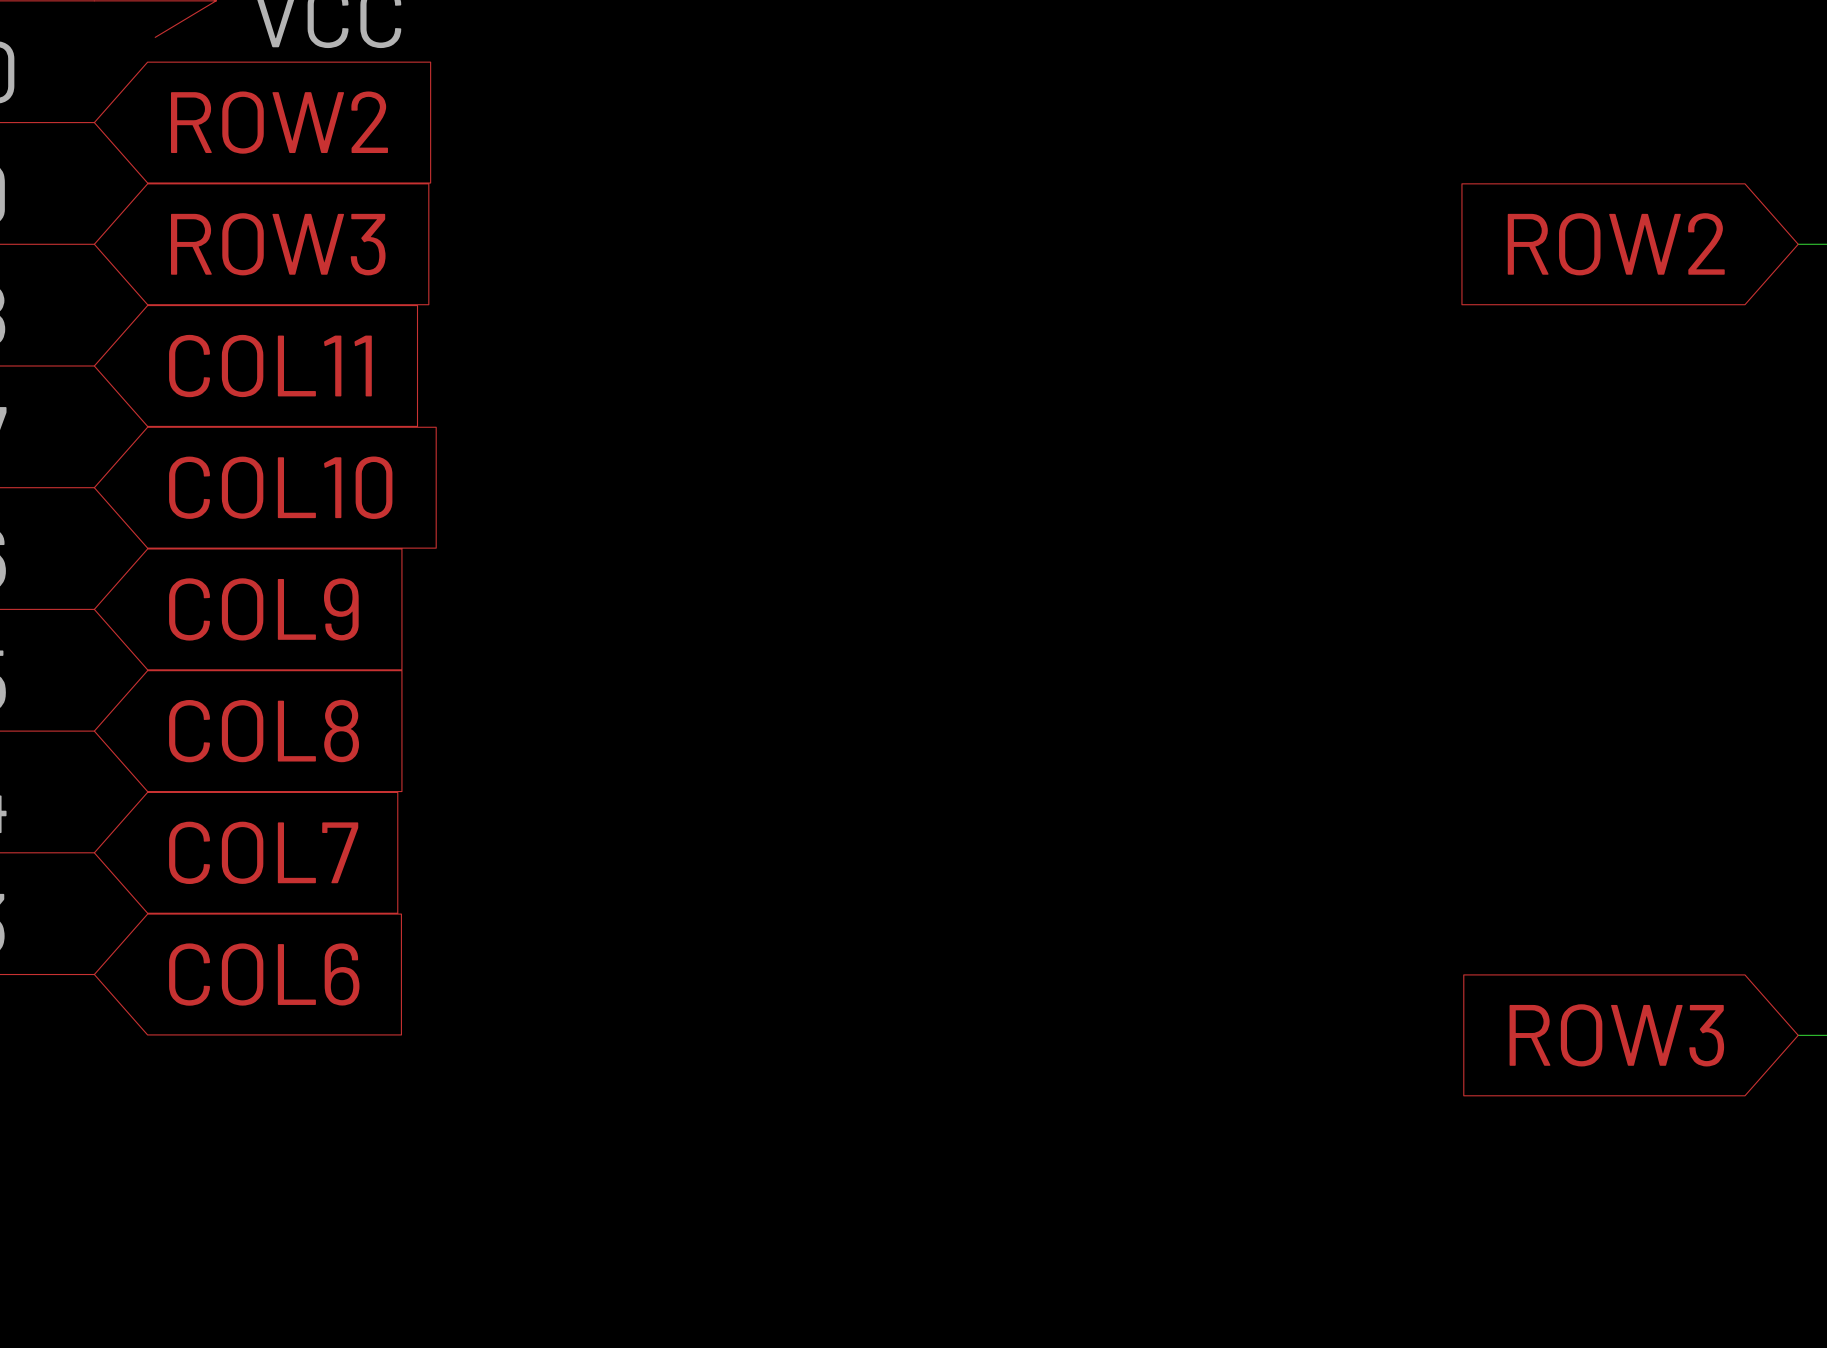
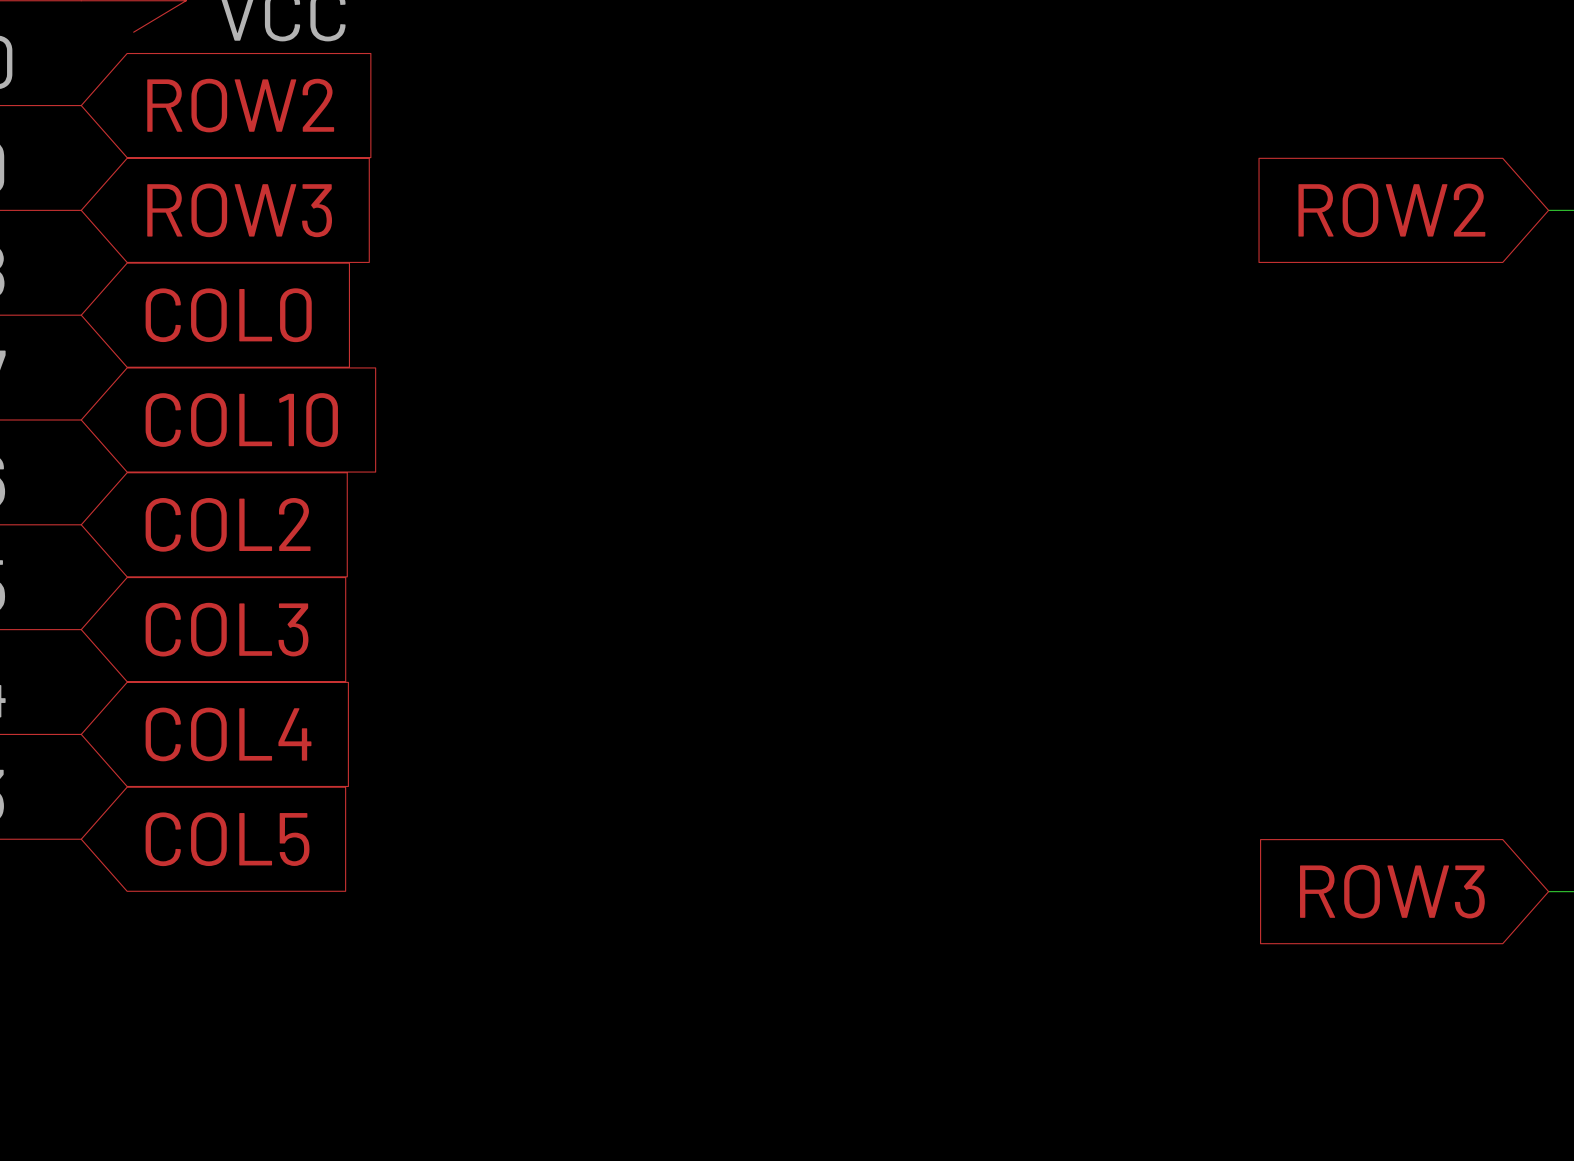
global label: COL11 (270, 366) -> COL0 (228, 315)
global label: COL9 (263, 609) -> COL2 (228, 524)
global label: COL8 (264, 731) -> COL3 (227, 629)
global label: COL7 (263, 852) -> COL4 (228, 734)
global label: COL6 (264, 974) -> COL5 (227, 839)

